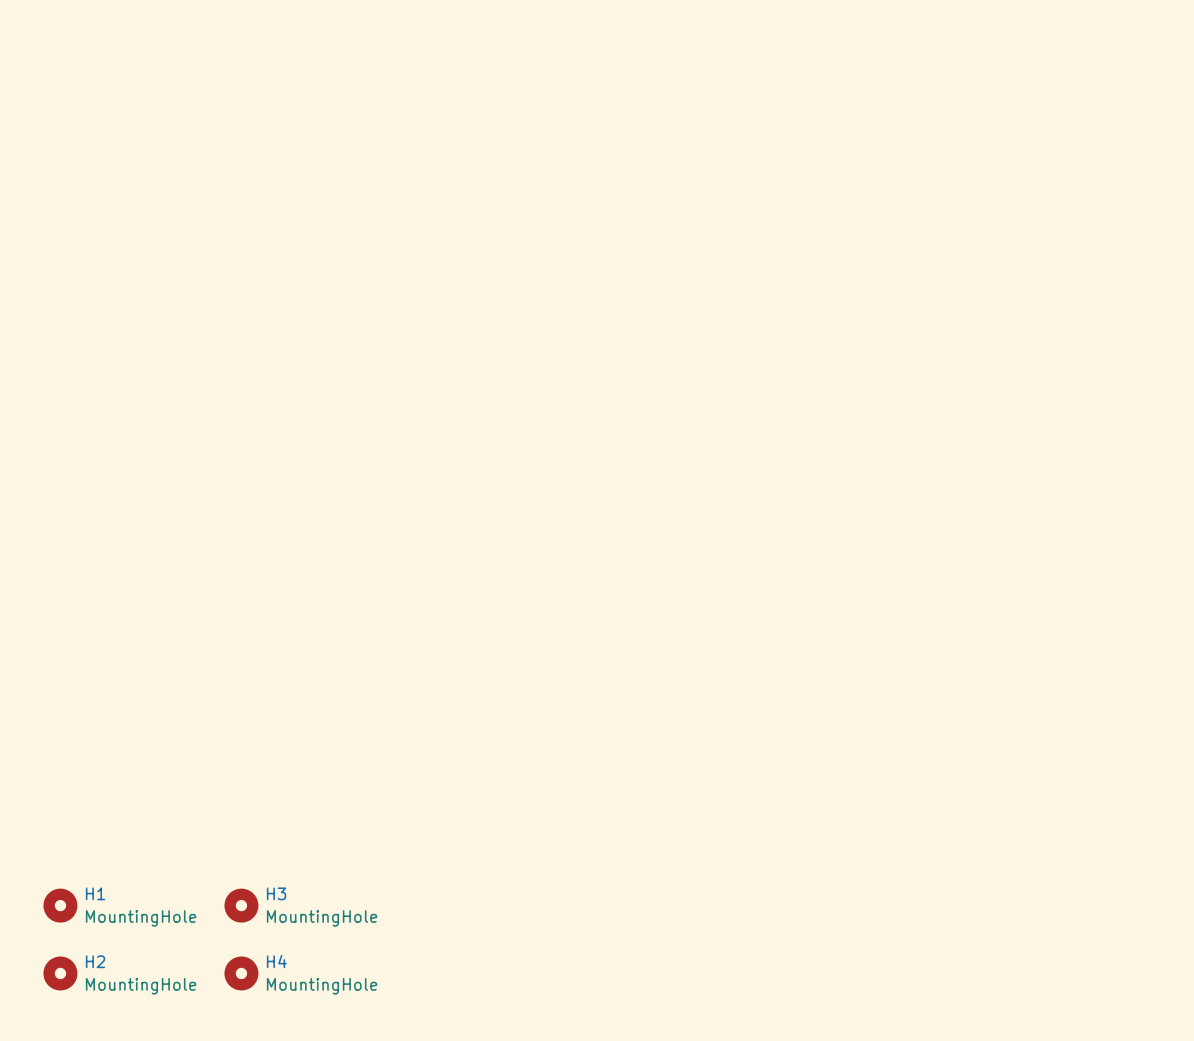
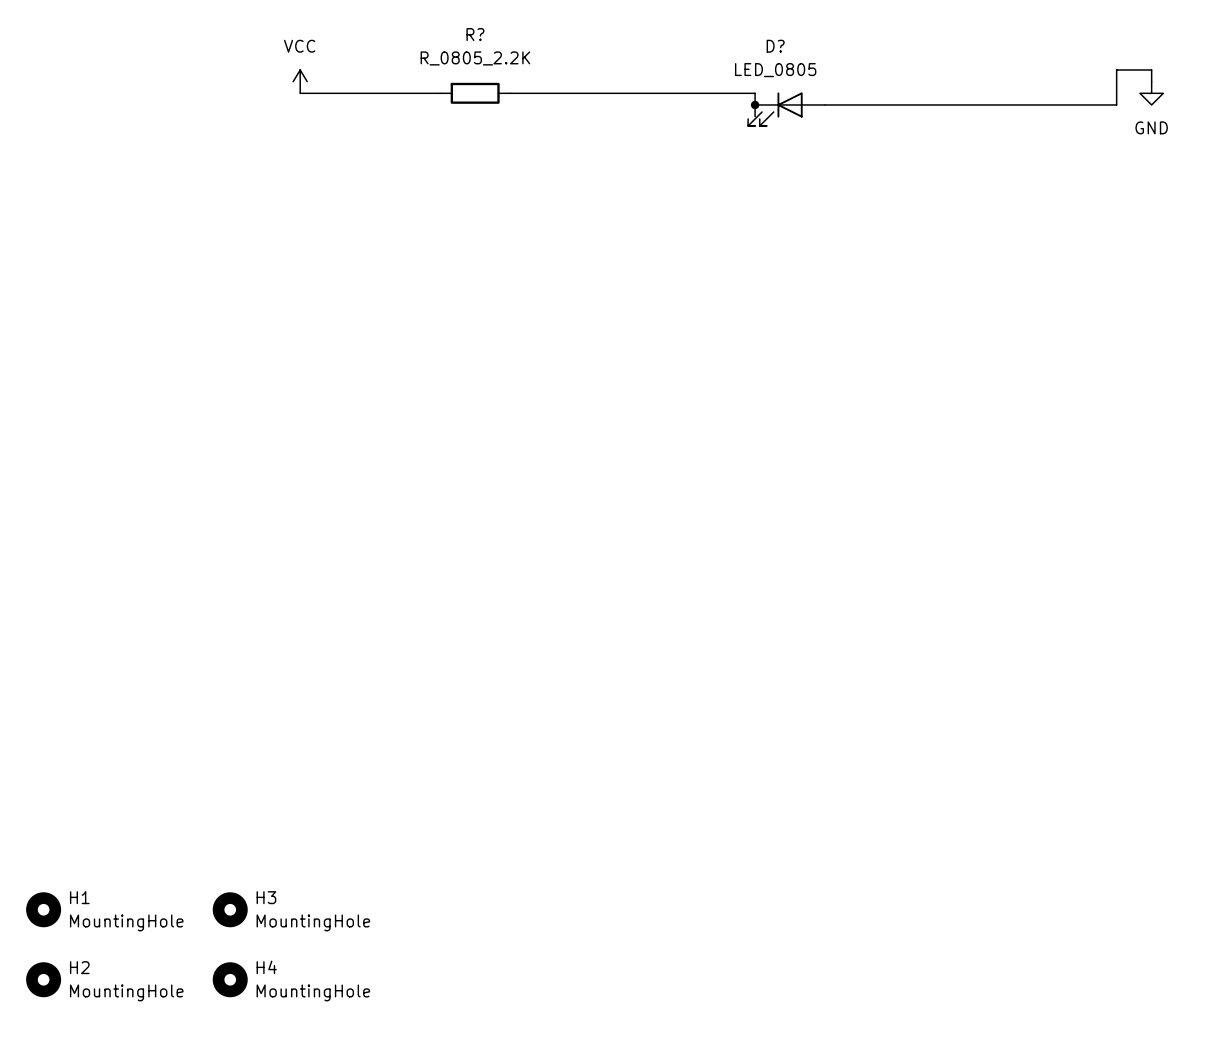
power symbol: none -> VCC (300, 81)
wire: none -> (1151, 81) (1151, 69) (1116, 69) (1116, 104) (825, 104)
wire: none -> (300, 93) (440, 93)
R?: none -> R_0805_2.2K (475, 93)
wire: none -> (510, 93) (755, 93) (755, 116)
power symbol: none -> GND (1151, 93)
junction: none -> (755, 104)
D?: none -> LED_0805 (786, 109)

